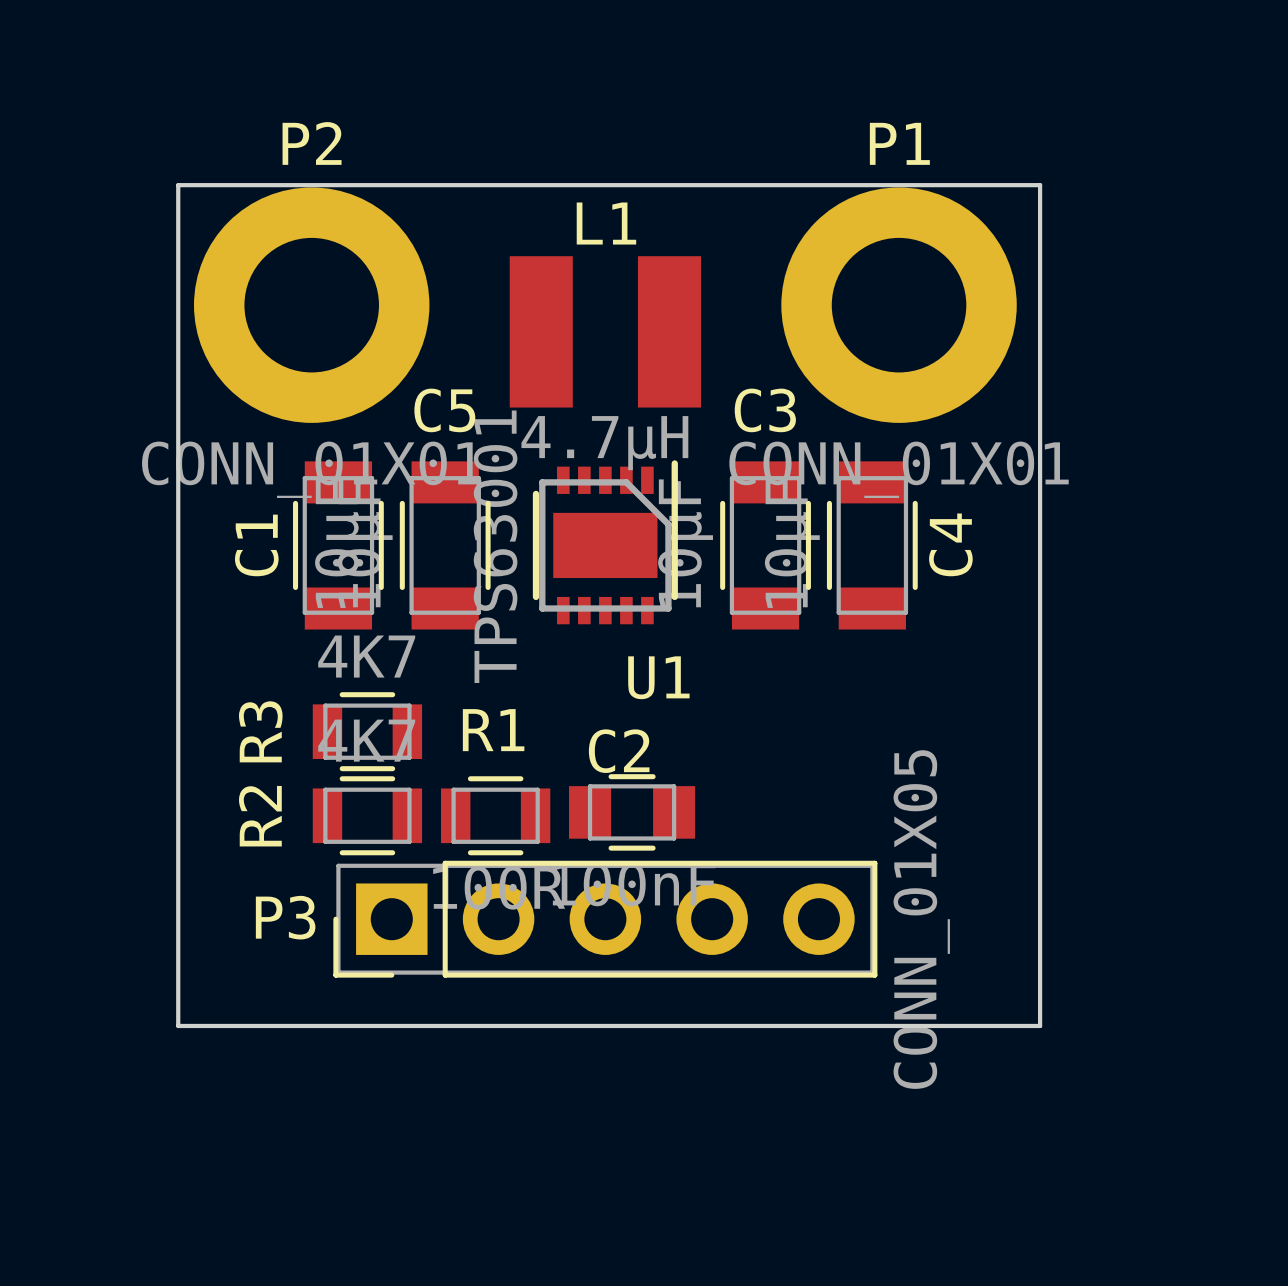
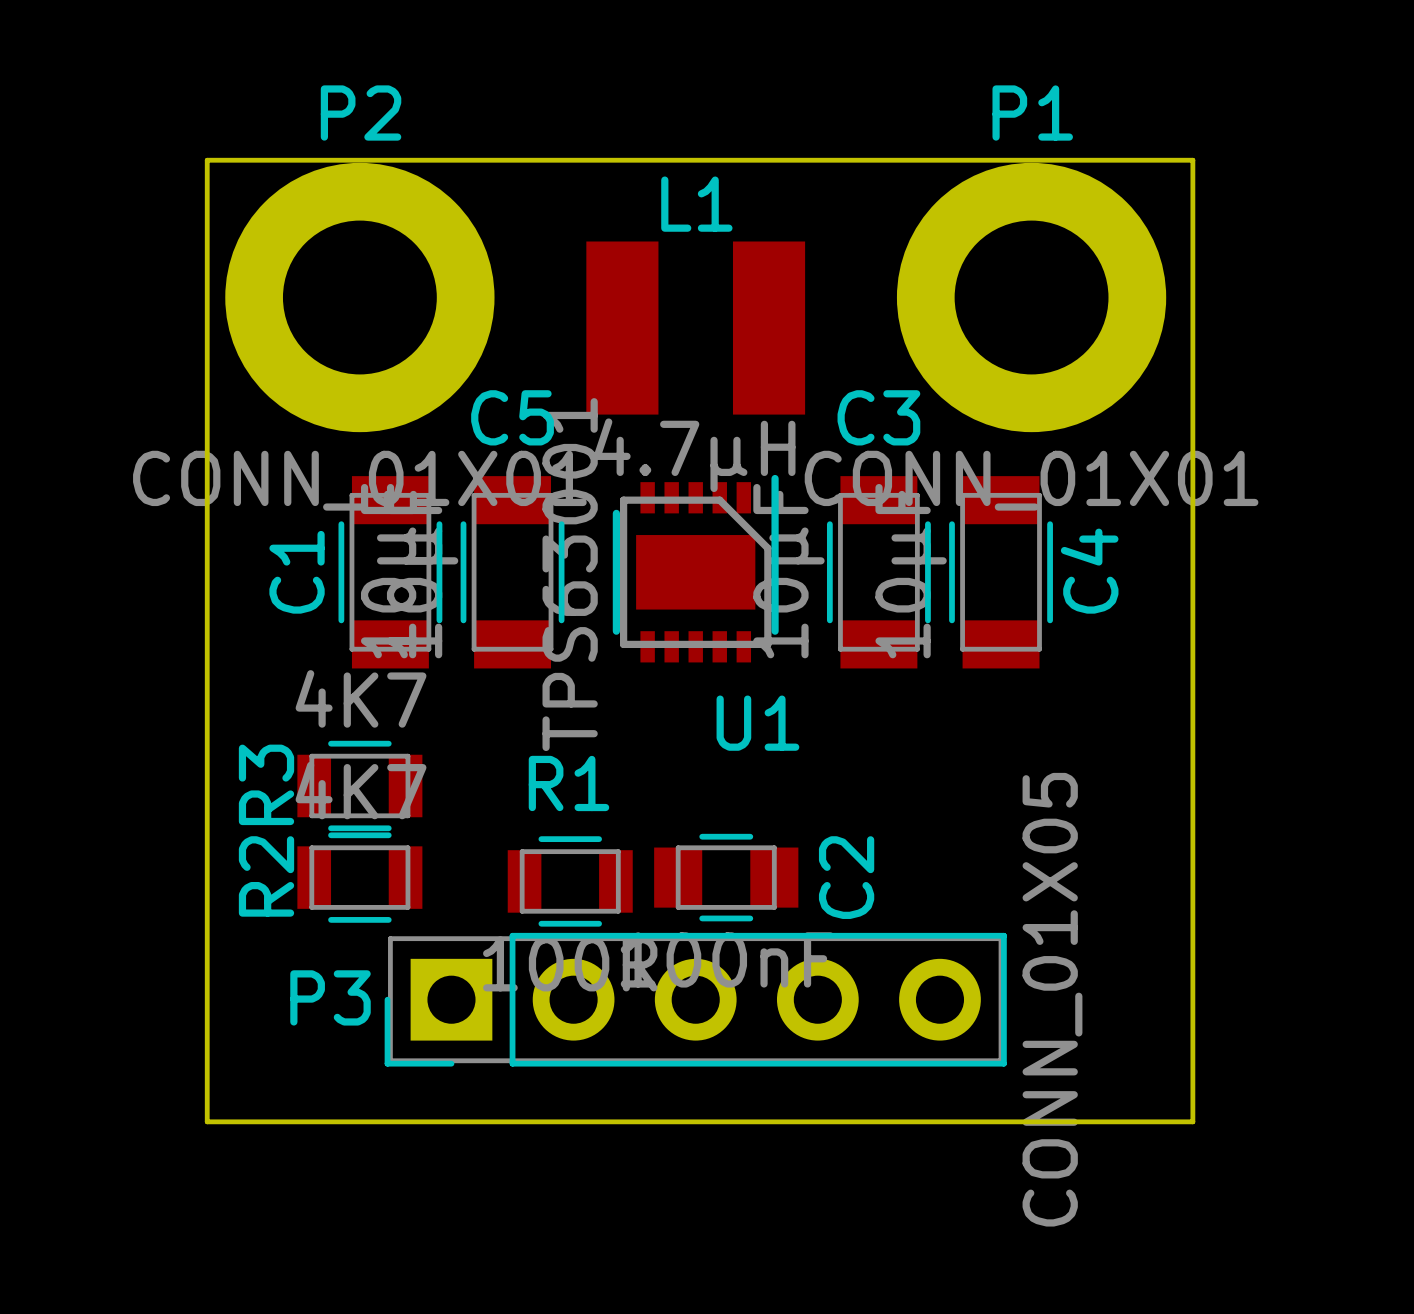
R3 name position: R3 (260, 731) -> R3 (266, 784)
R3 position: (367, 731) -> (359, 786)
C2 name rotation: 0° (619, 751) -> 90° counterclockwise (846, 877)
C2 name position: C2 (619, 751) -> C2 (846, 877)
R2 position: (367, 815) -> (359, 877)
R2 name position: R2 (260, 816) -> R2 (266, 876)

